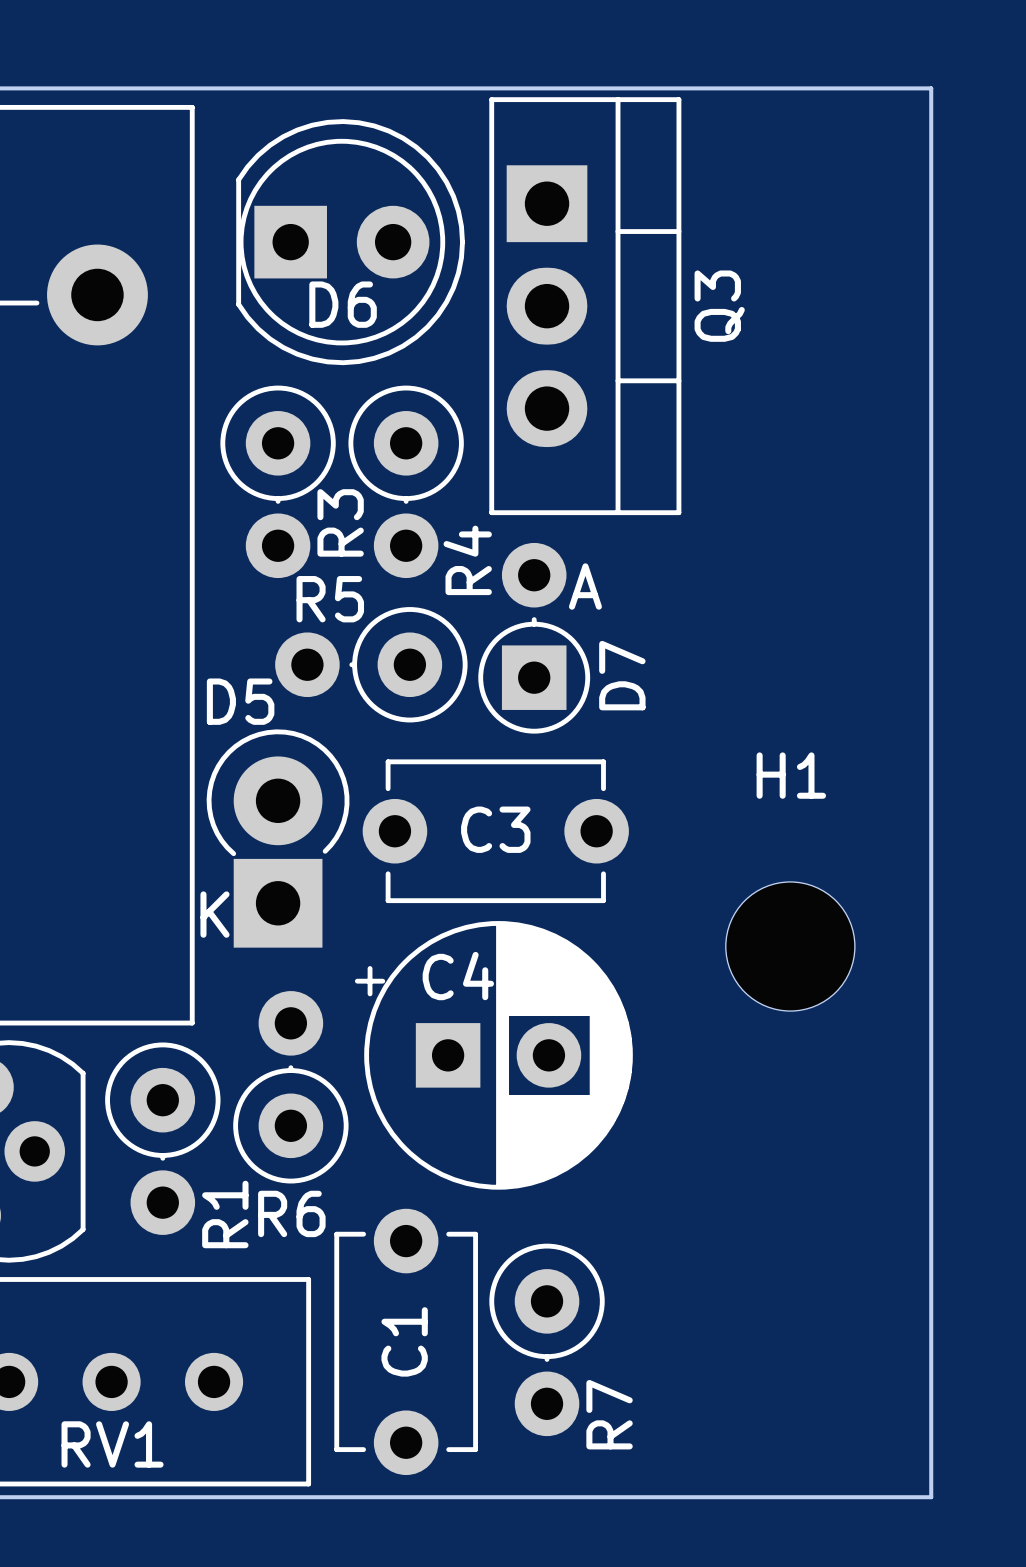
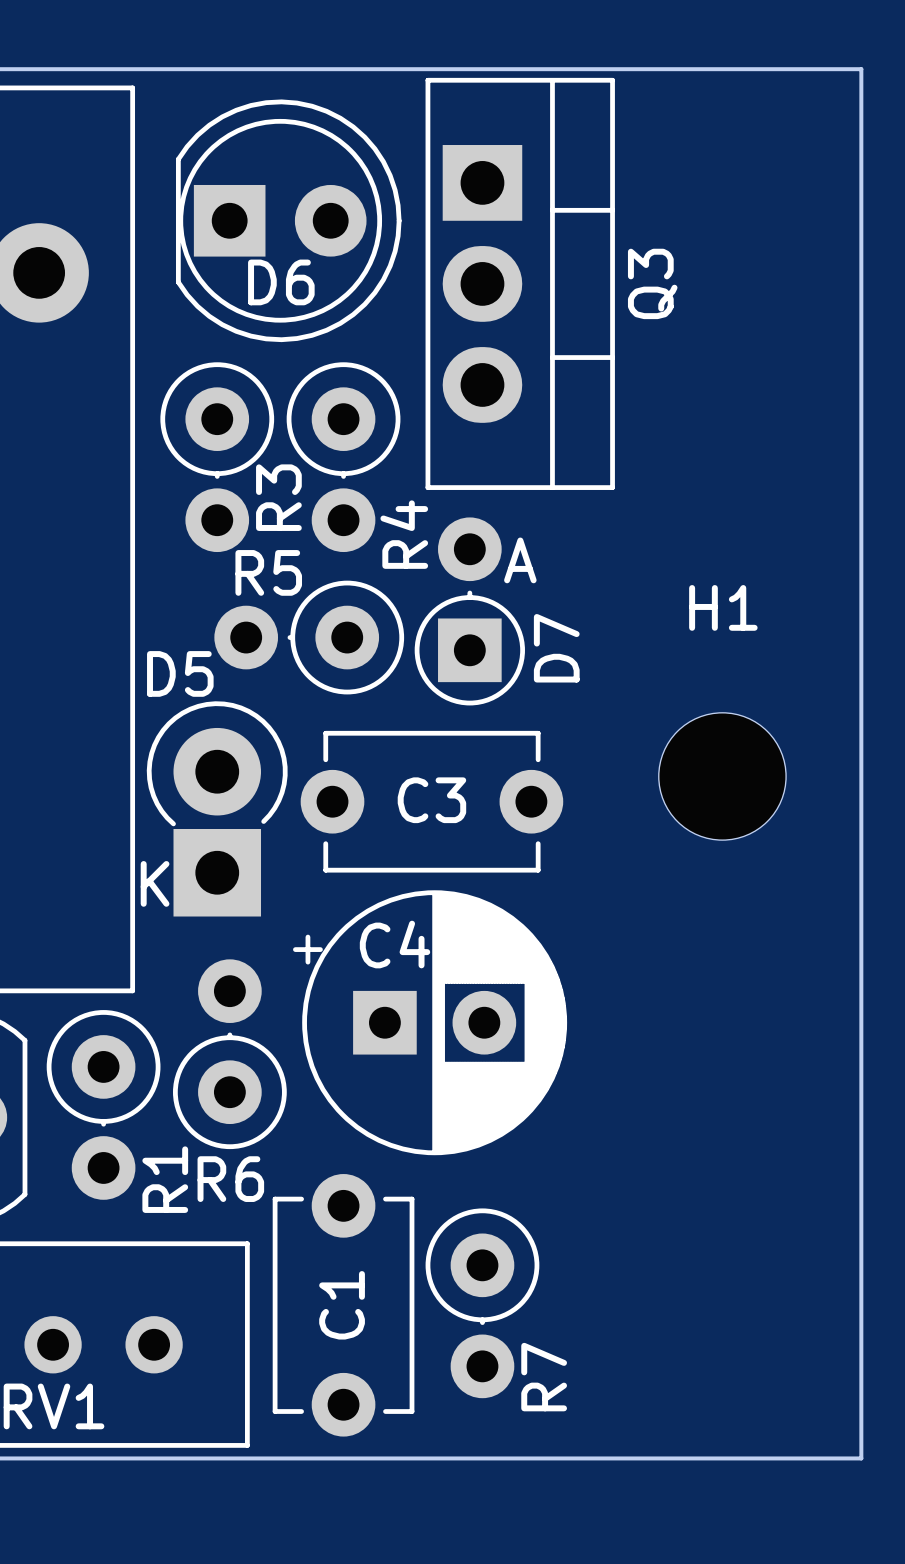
H1 position: (790, 946) -> (722, 776)

